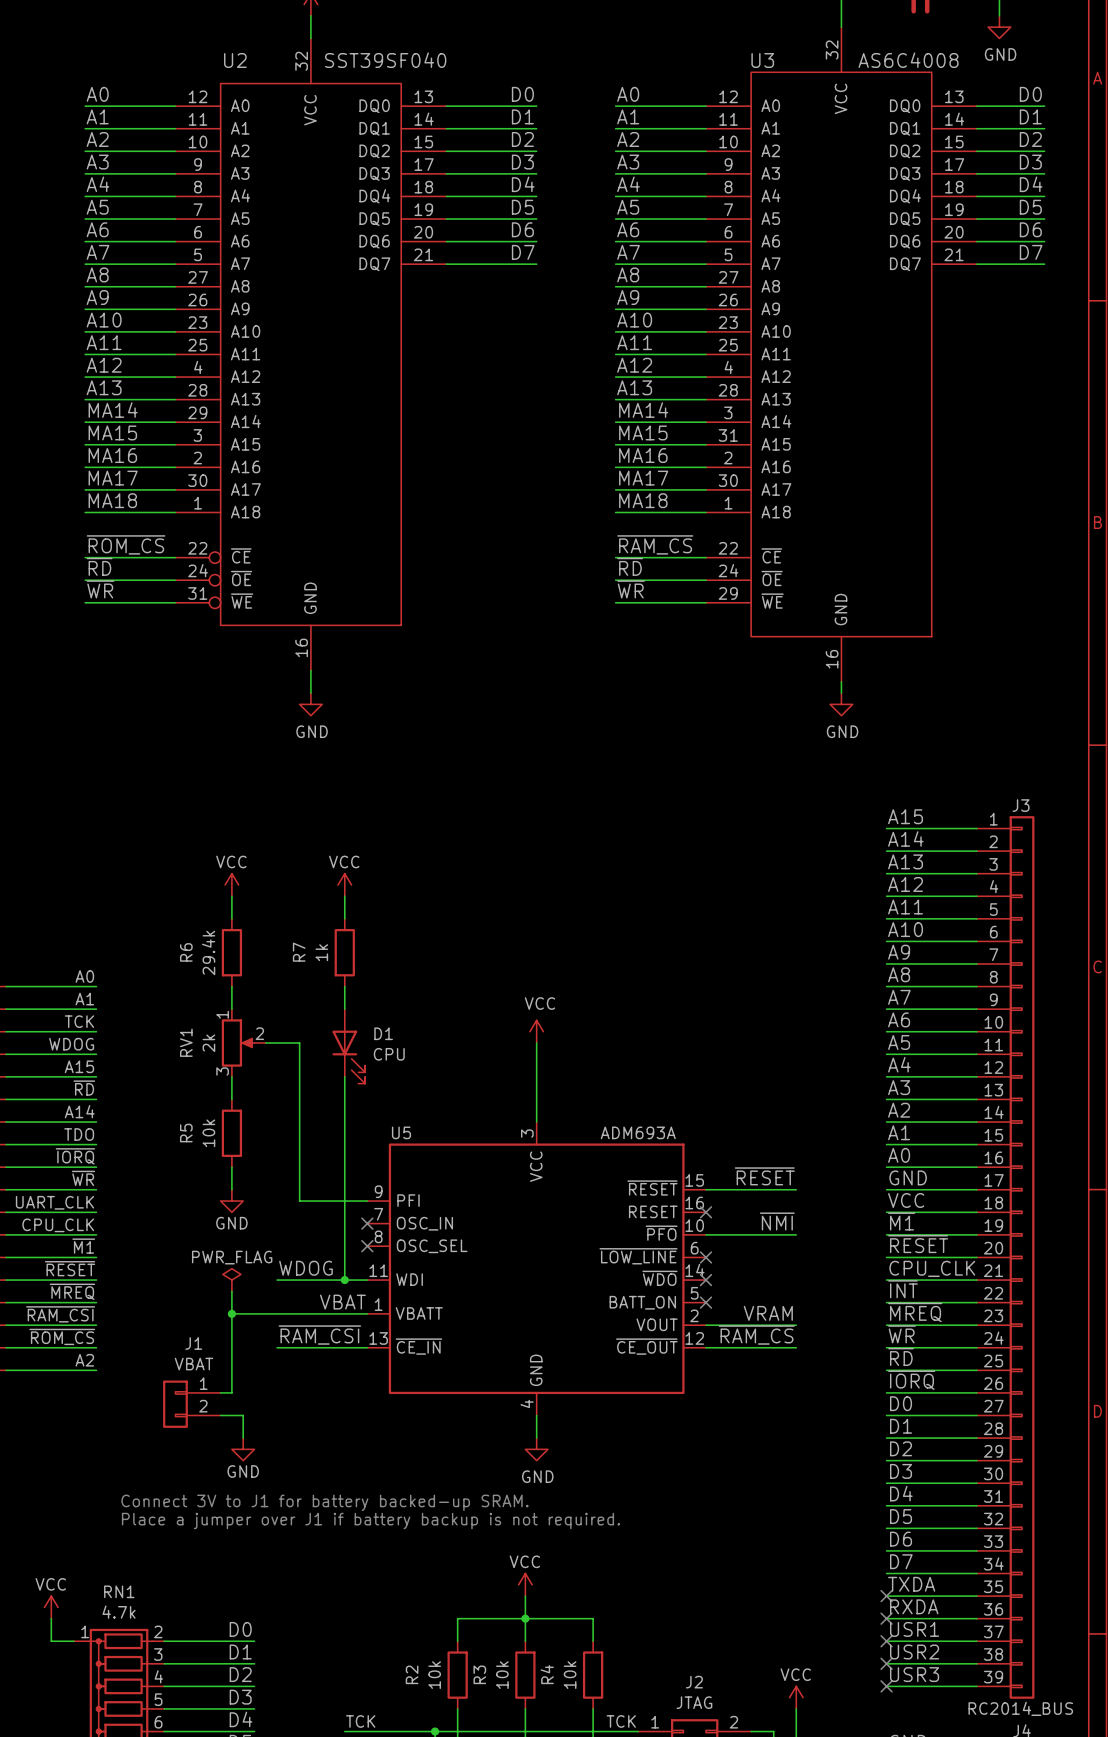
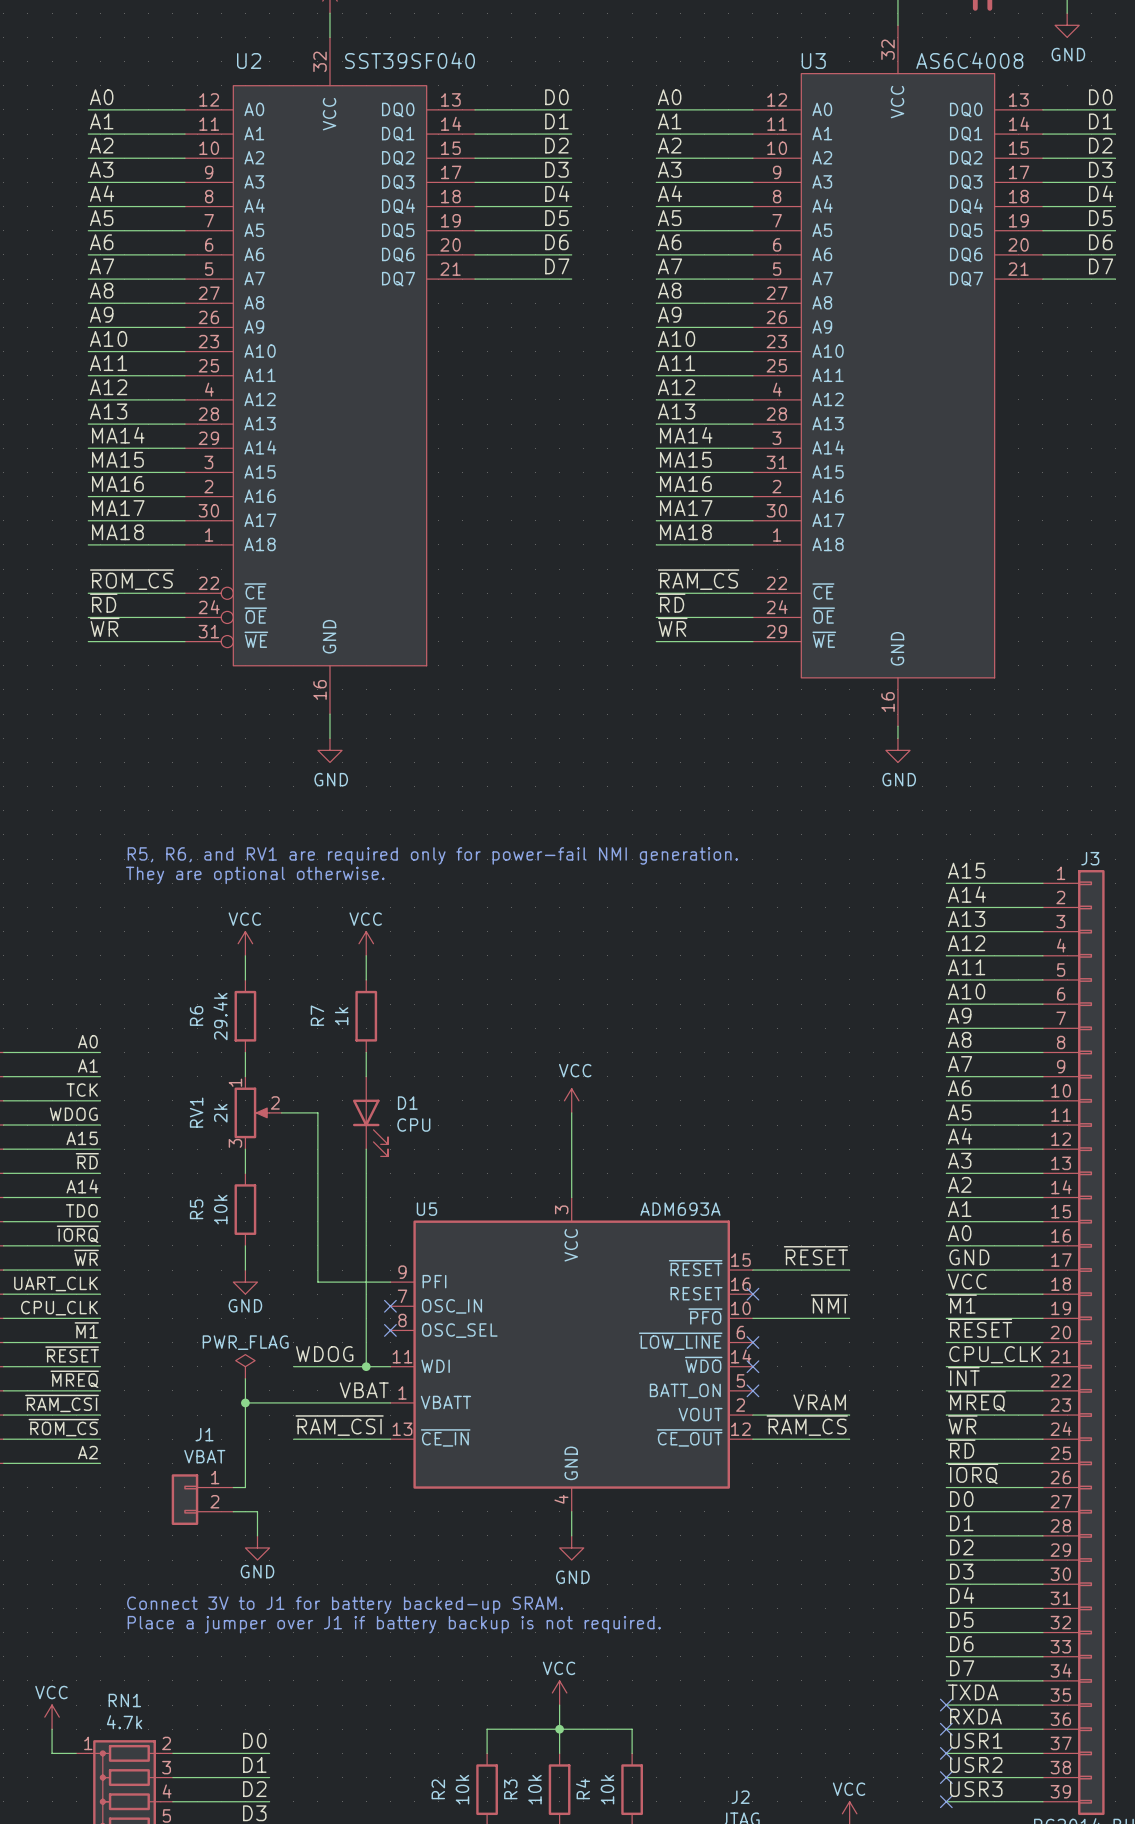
text: none -> R5, R6, and RV1 are required only for power-fail NMI generation. (432, 855)
text: none -> They are optional otherwise. (255, 875)

